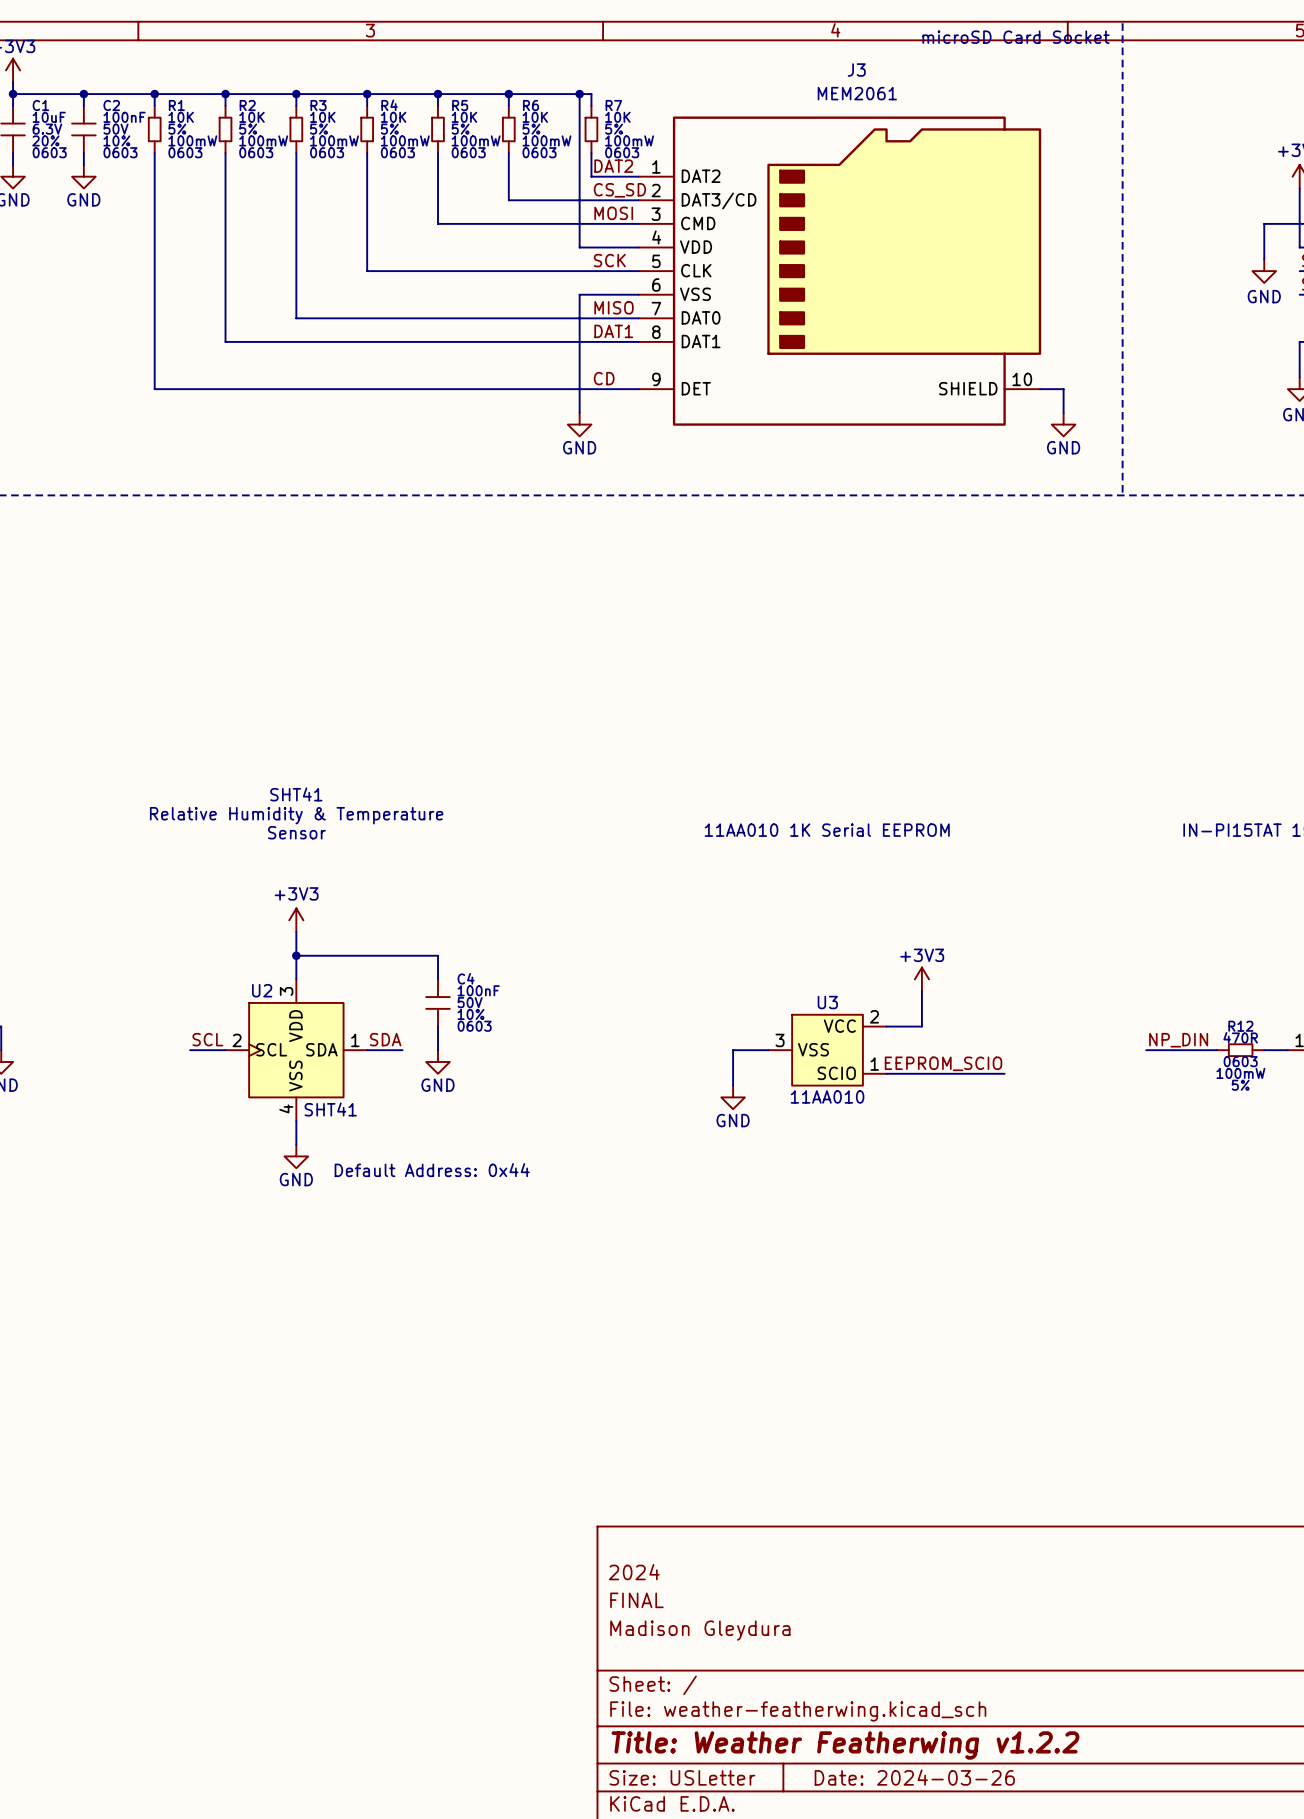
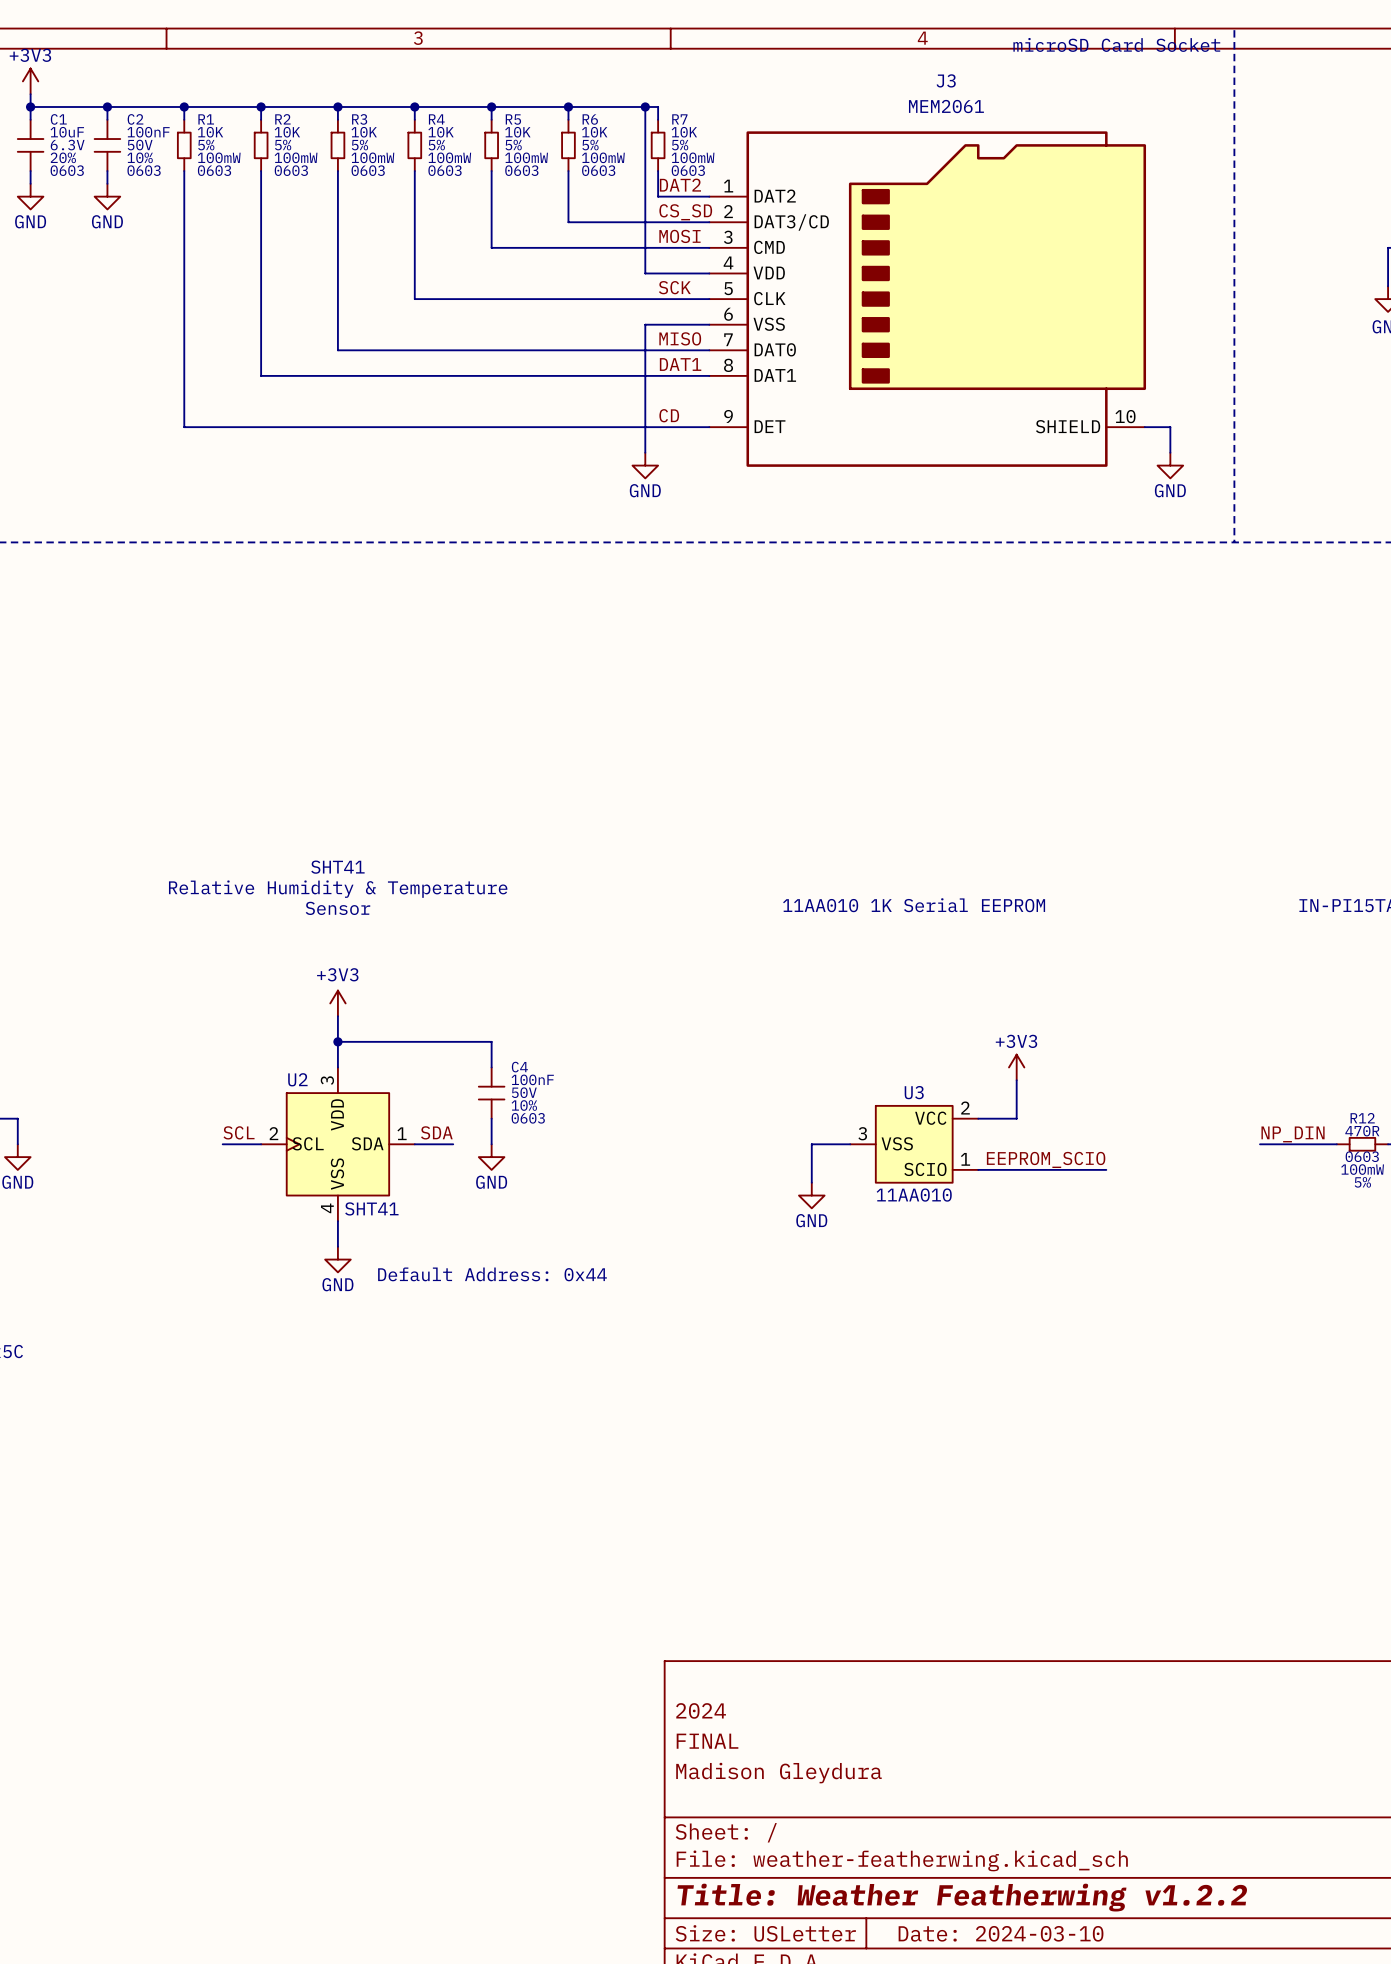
title block: Date: 2024-03-26 (914, 1777) -> Date: 2024-03-10 (1001, 1933)

